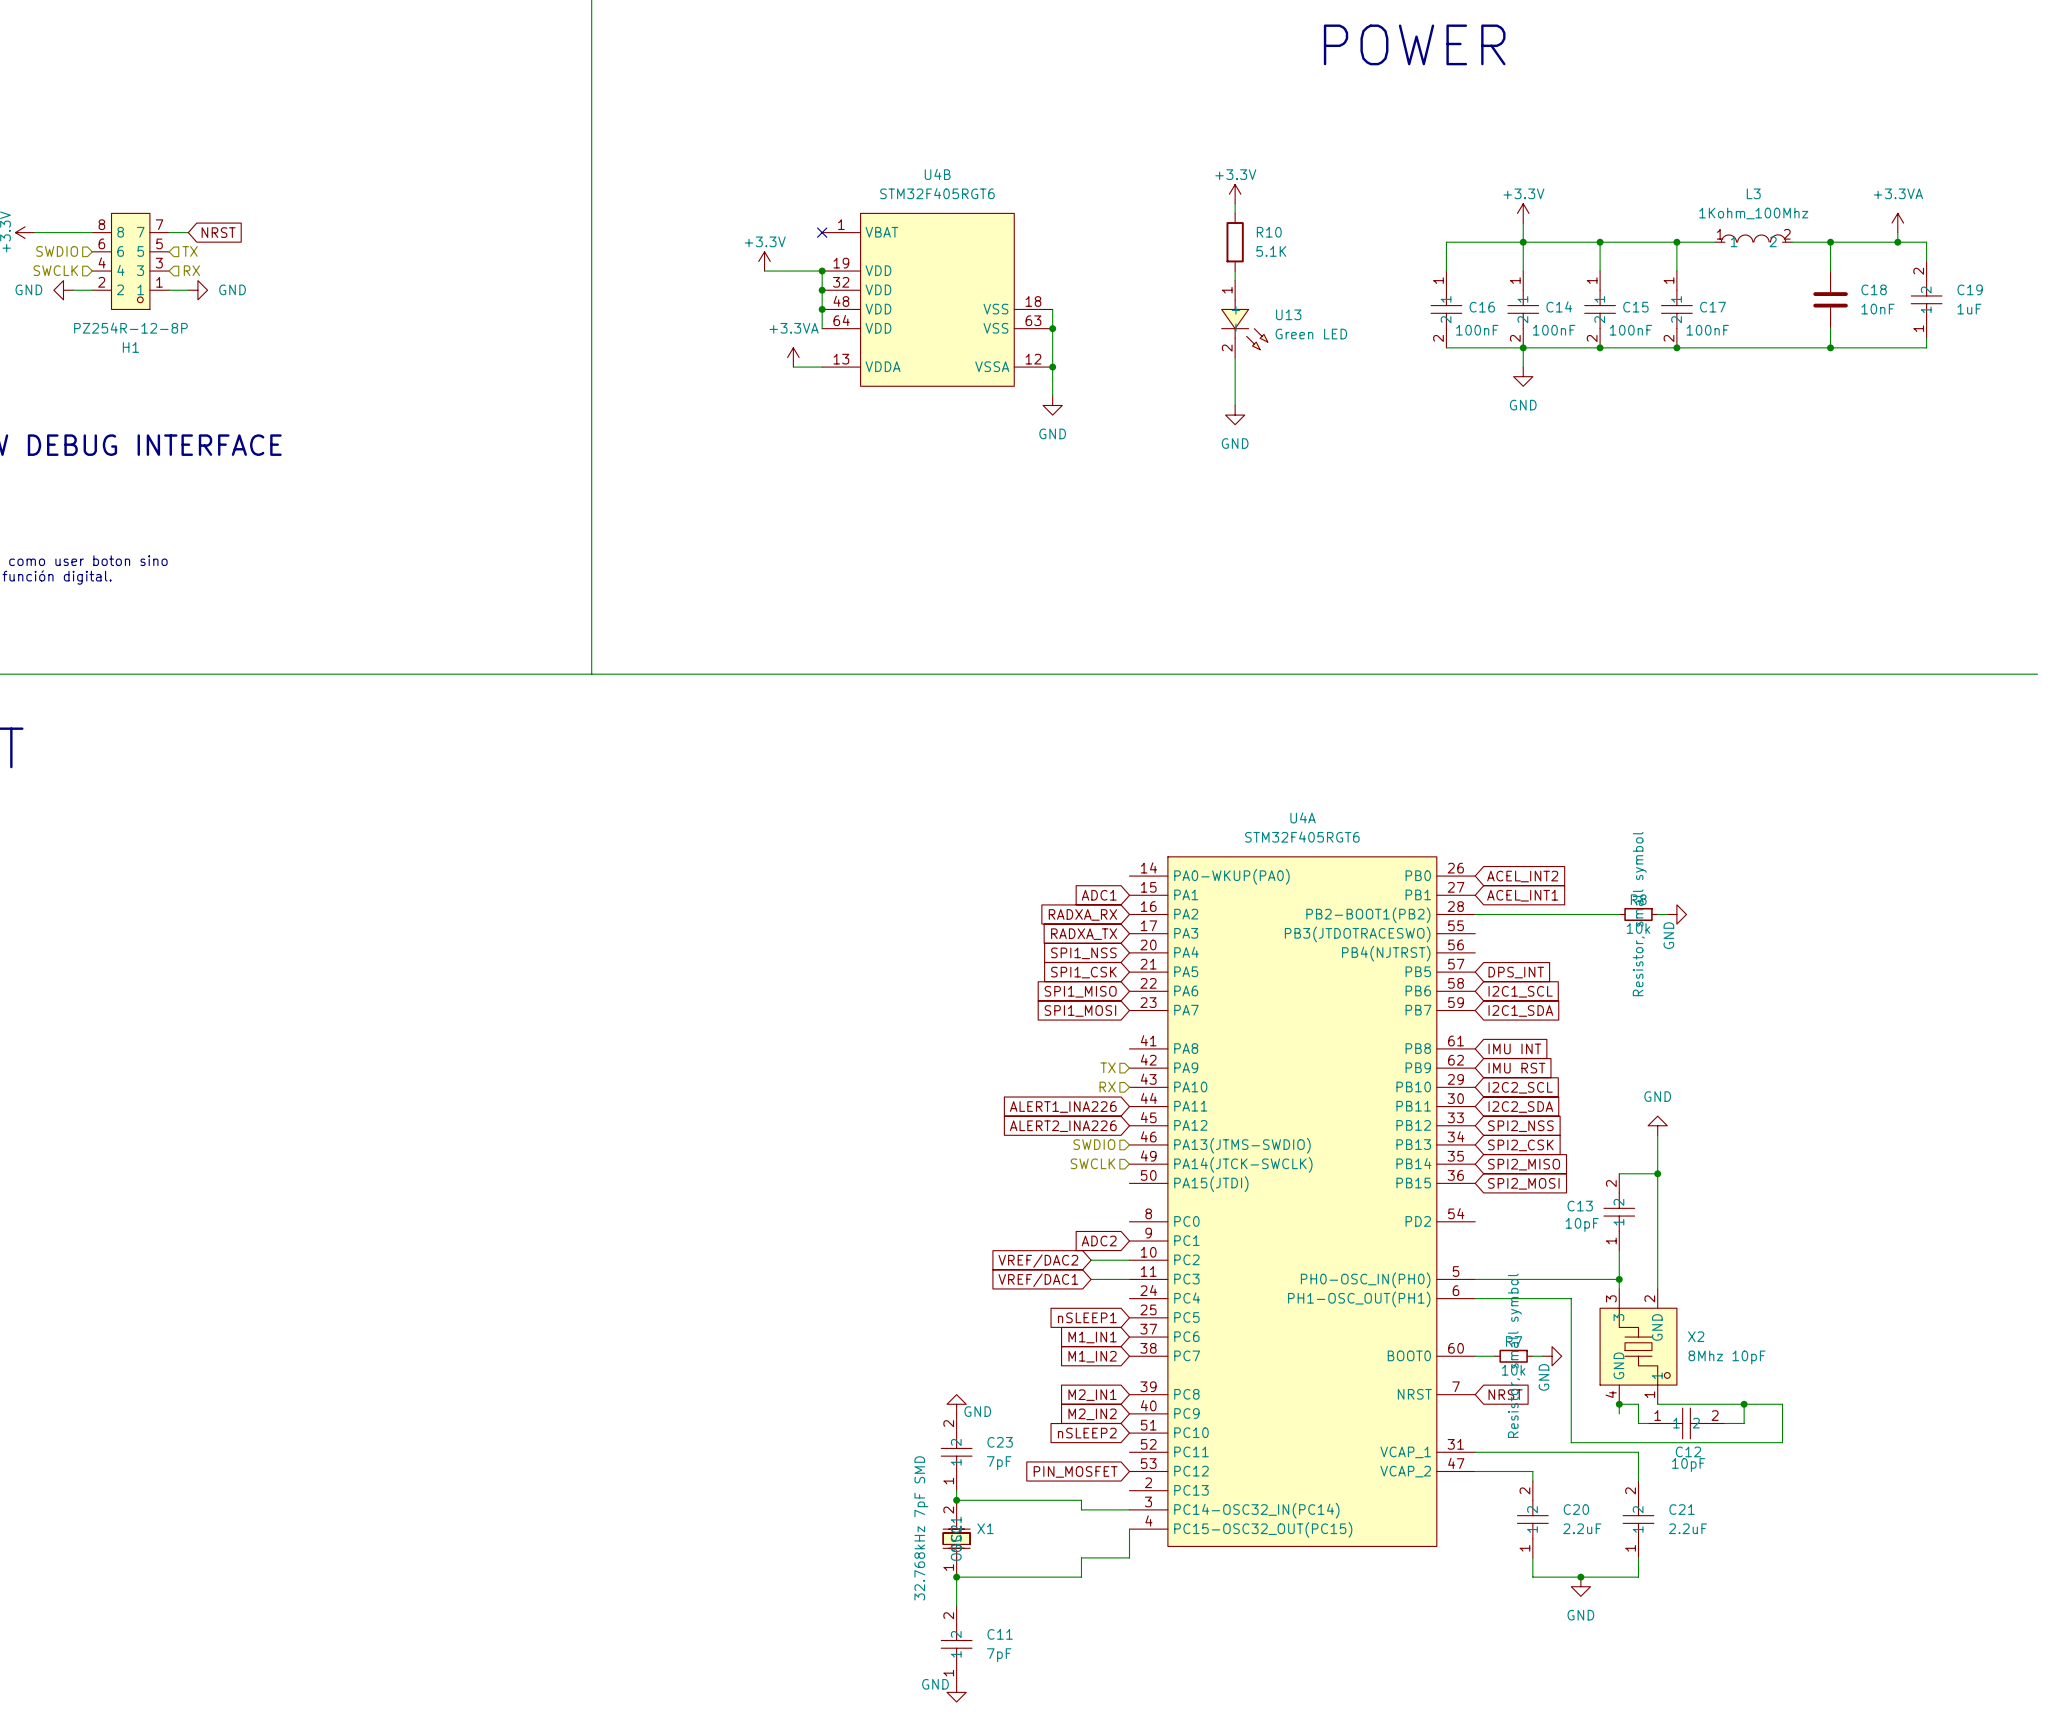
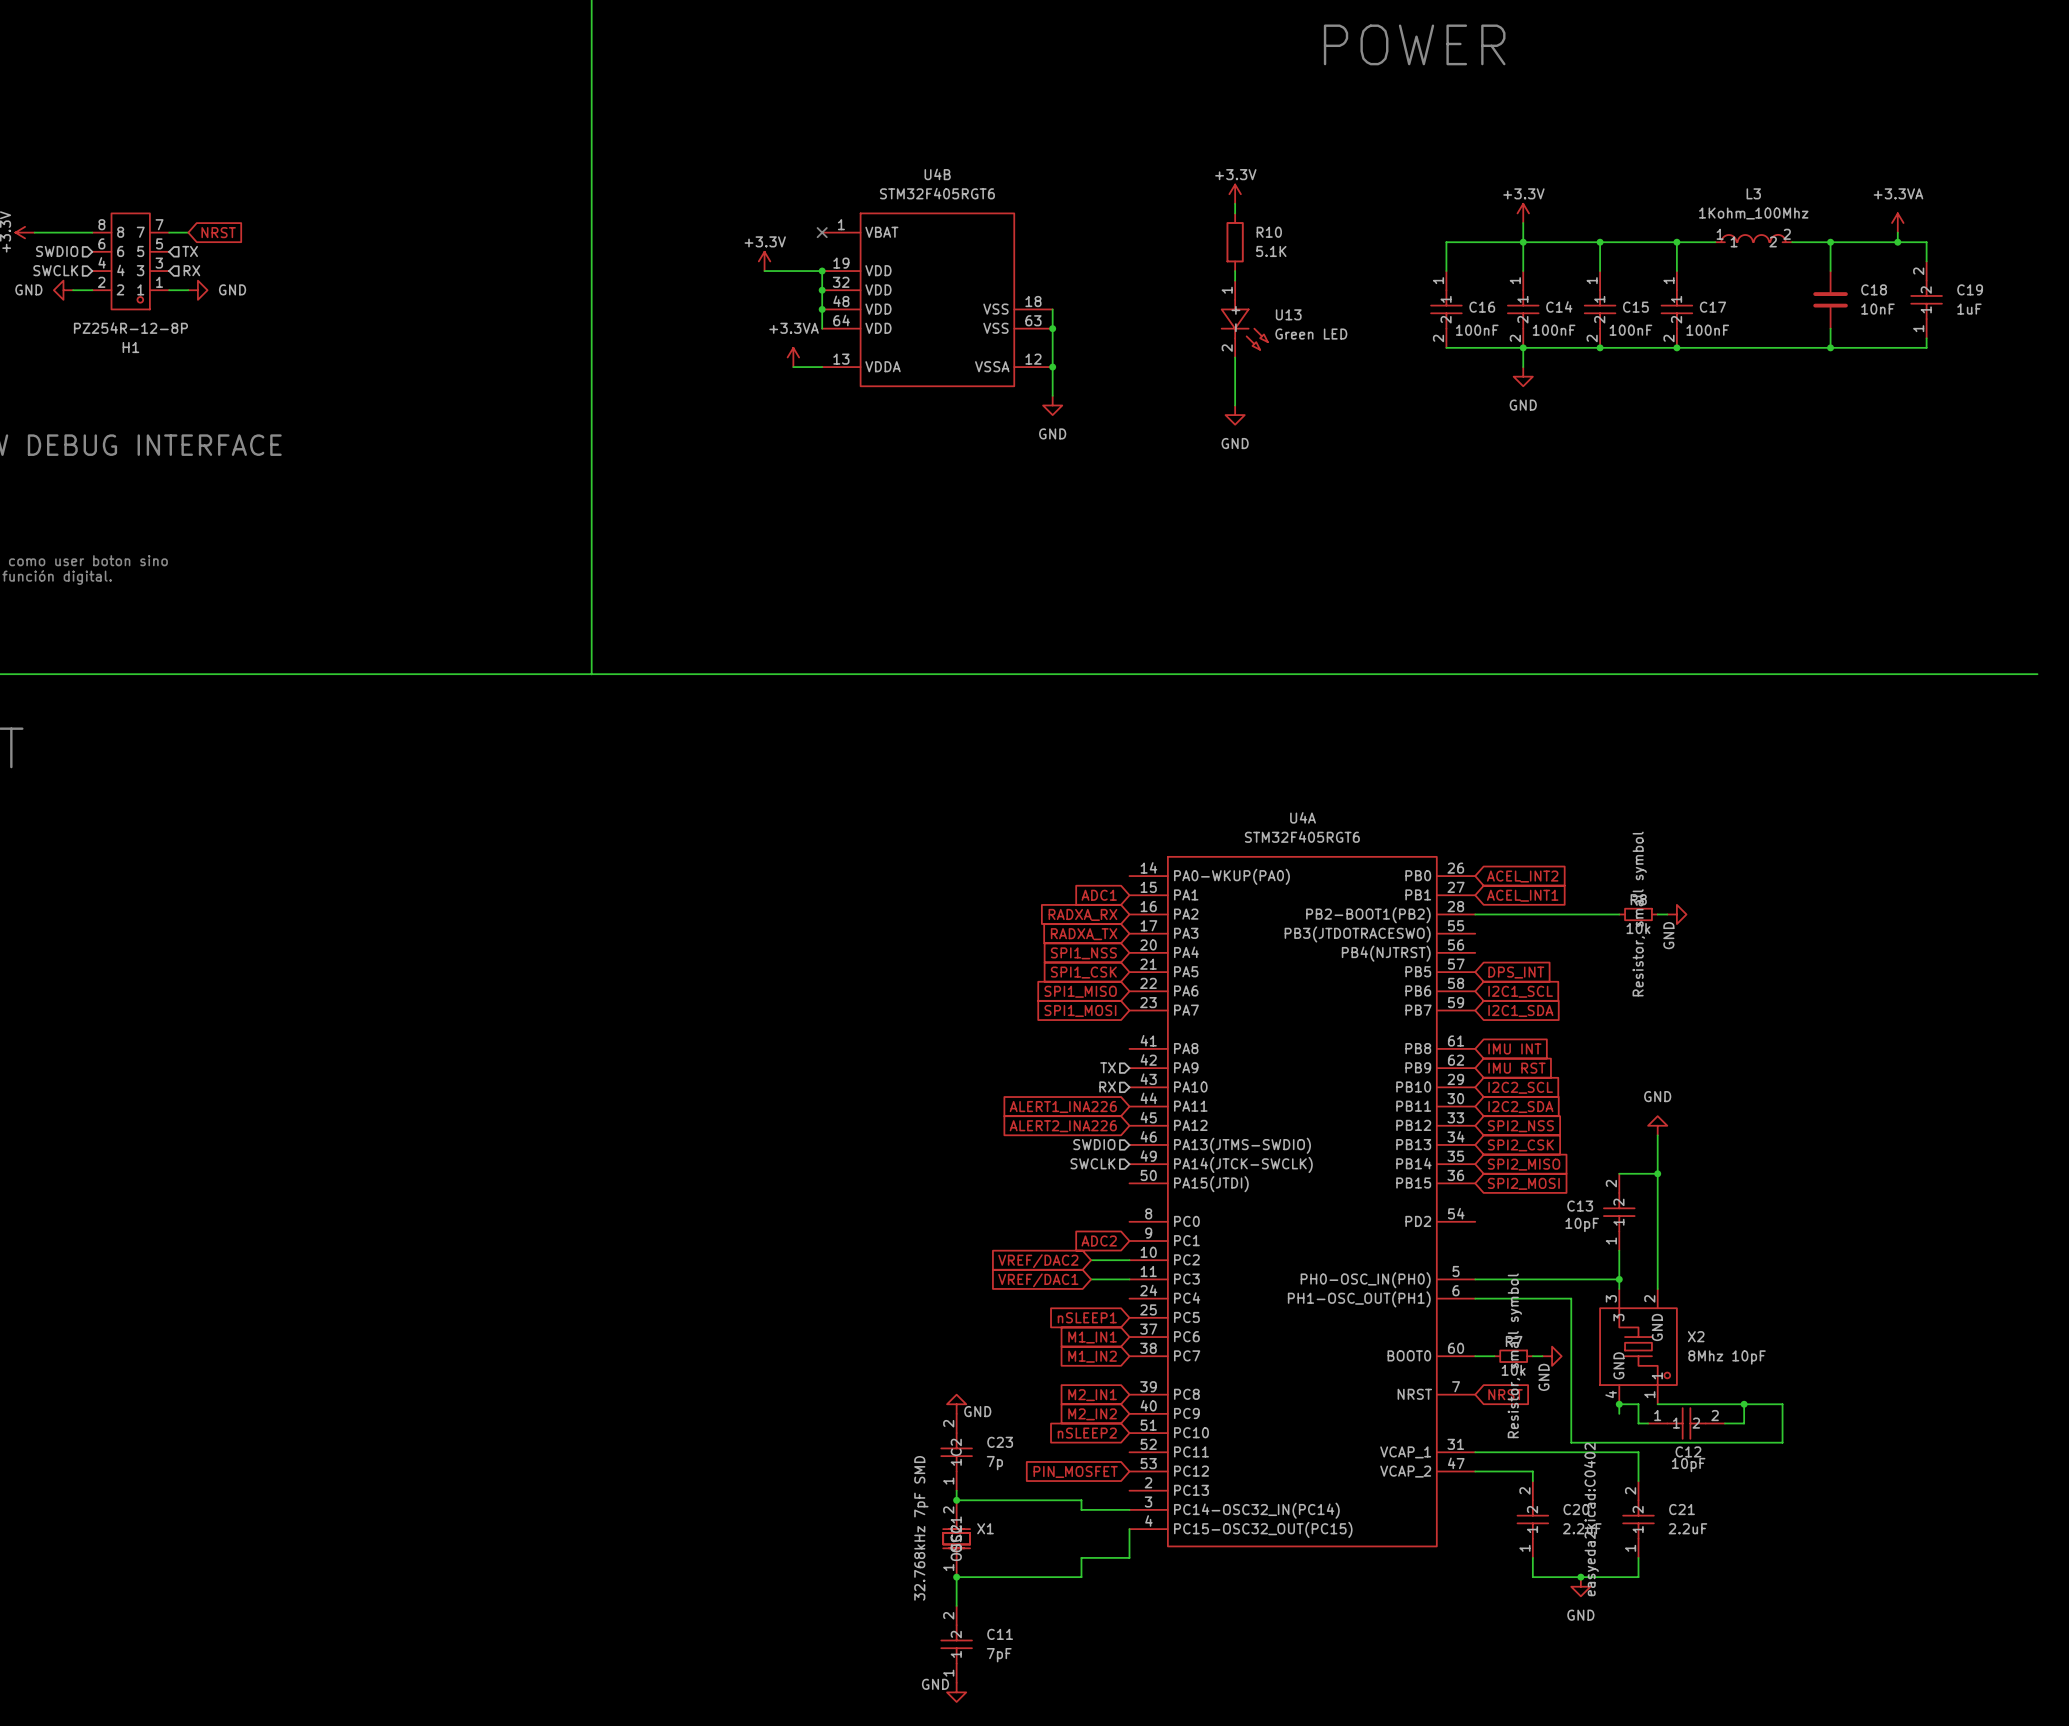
C23 text: none -> C (956, 1452)
C23 value: 7pF (999, 1463) -> 7p (994, 1463)
C20 text: none -> easyeda2kicad:C0402 (1591, 1519)

